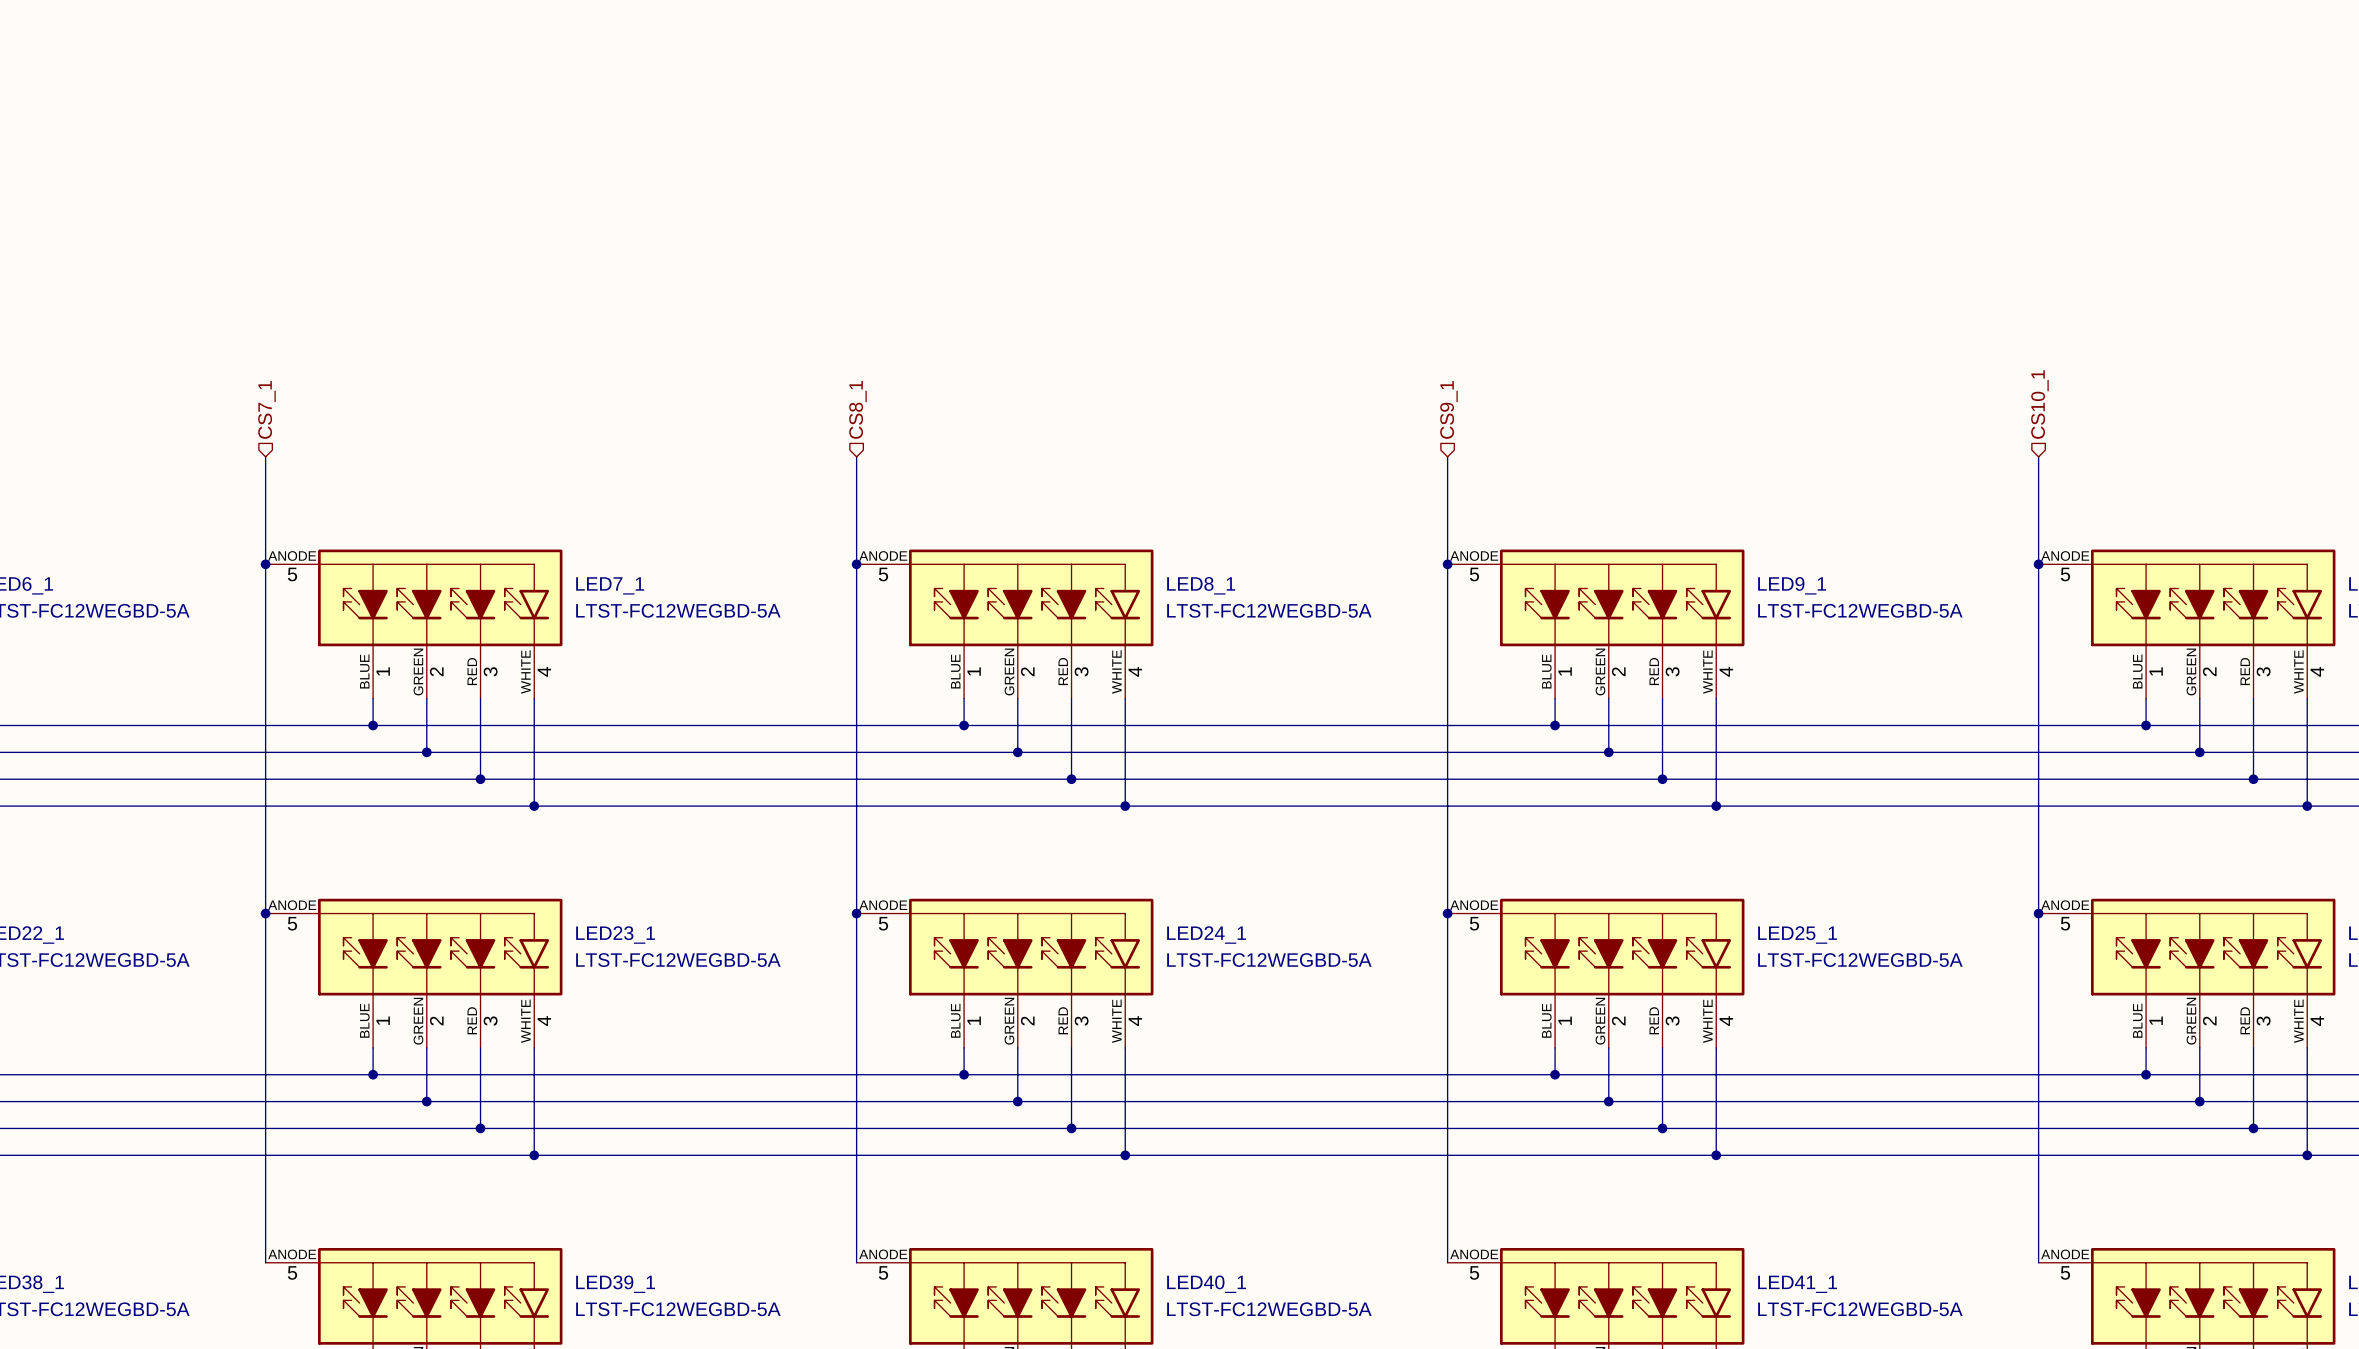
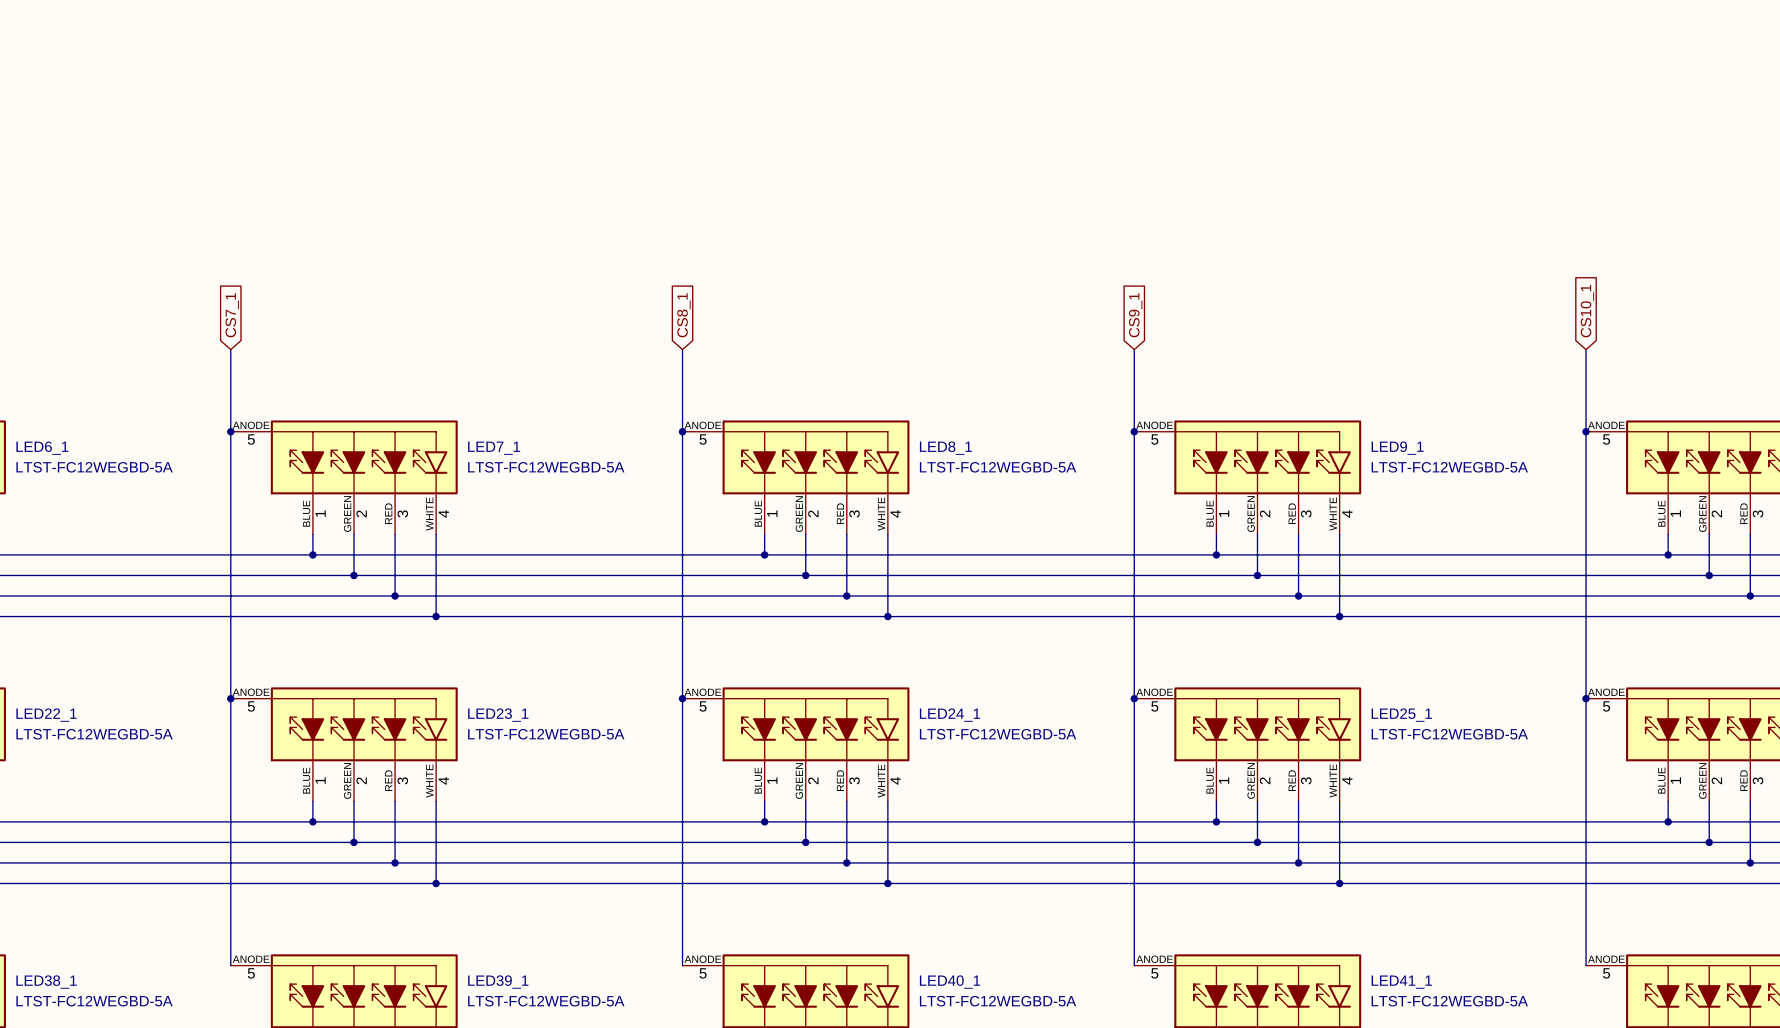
hierarchical label: CS10_1 (2039, 404) -> none
global label: none -> CS10_1 (1587, 311)
hierarchical label: CS7_1 (266, 409) -> none
hierarchical label: CS8_1 (857, 409) -> none
hierarchical label: CS9_1 (1448, 409) -> none
global label: none -> CS7_1 (232, 315)
global label: none -> CS8_1 (683, 315)
global label: none -> CS9_1 (1135, 315)

